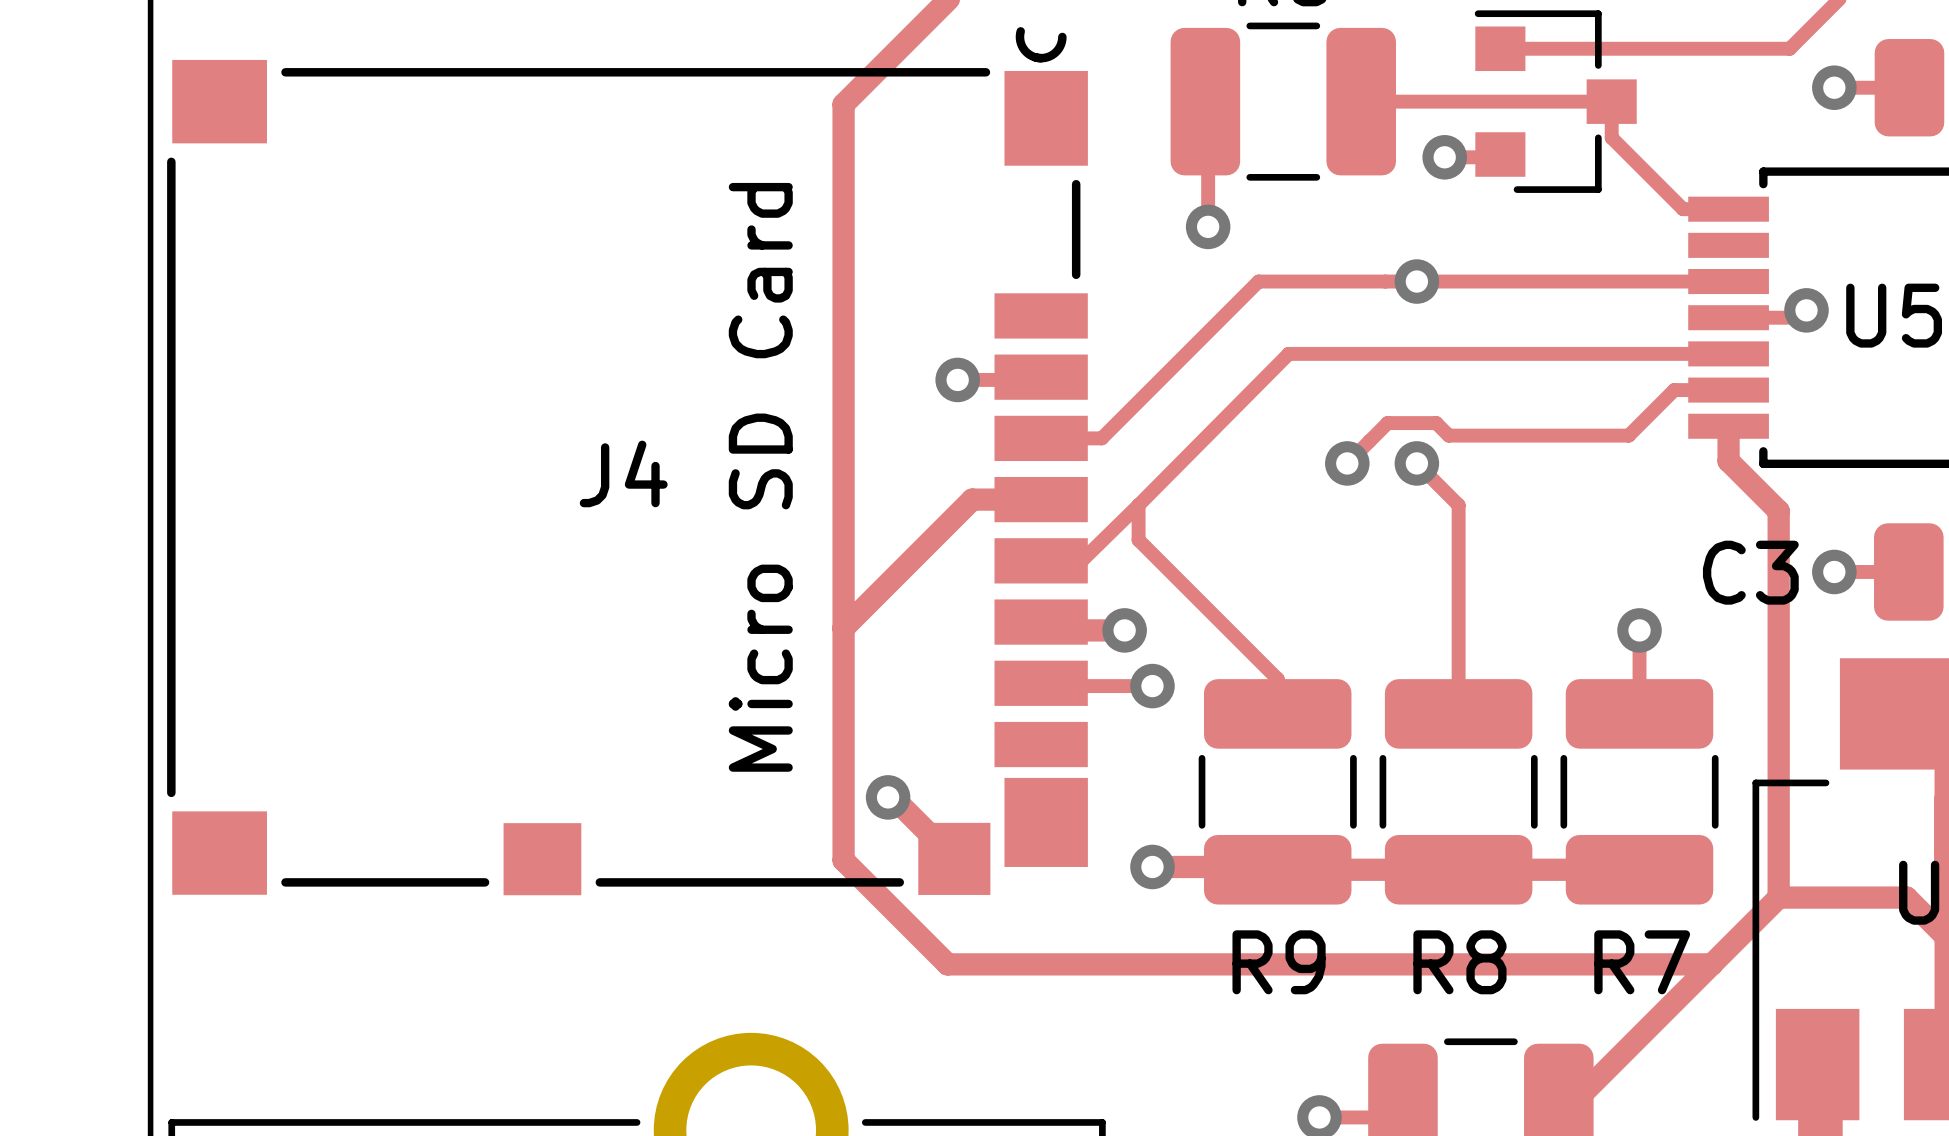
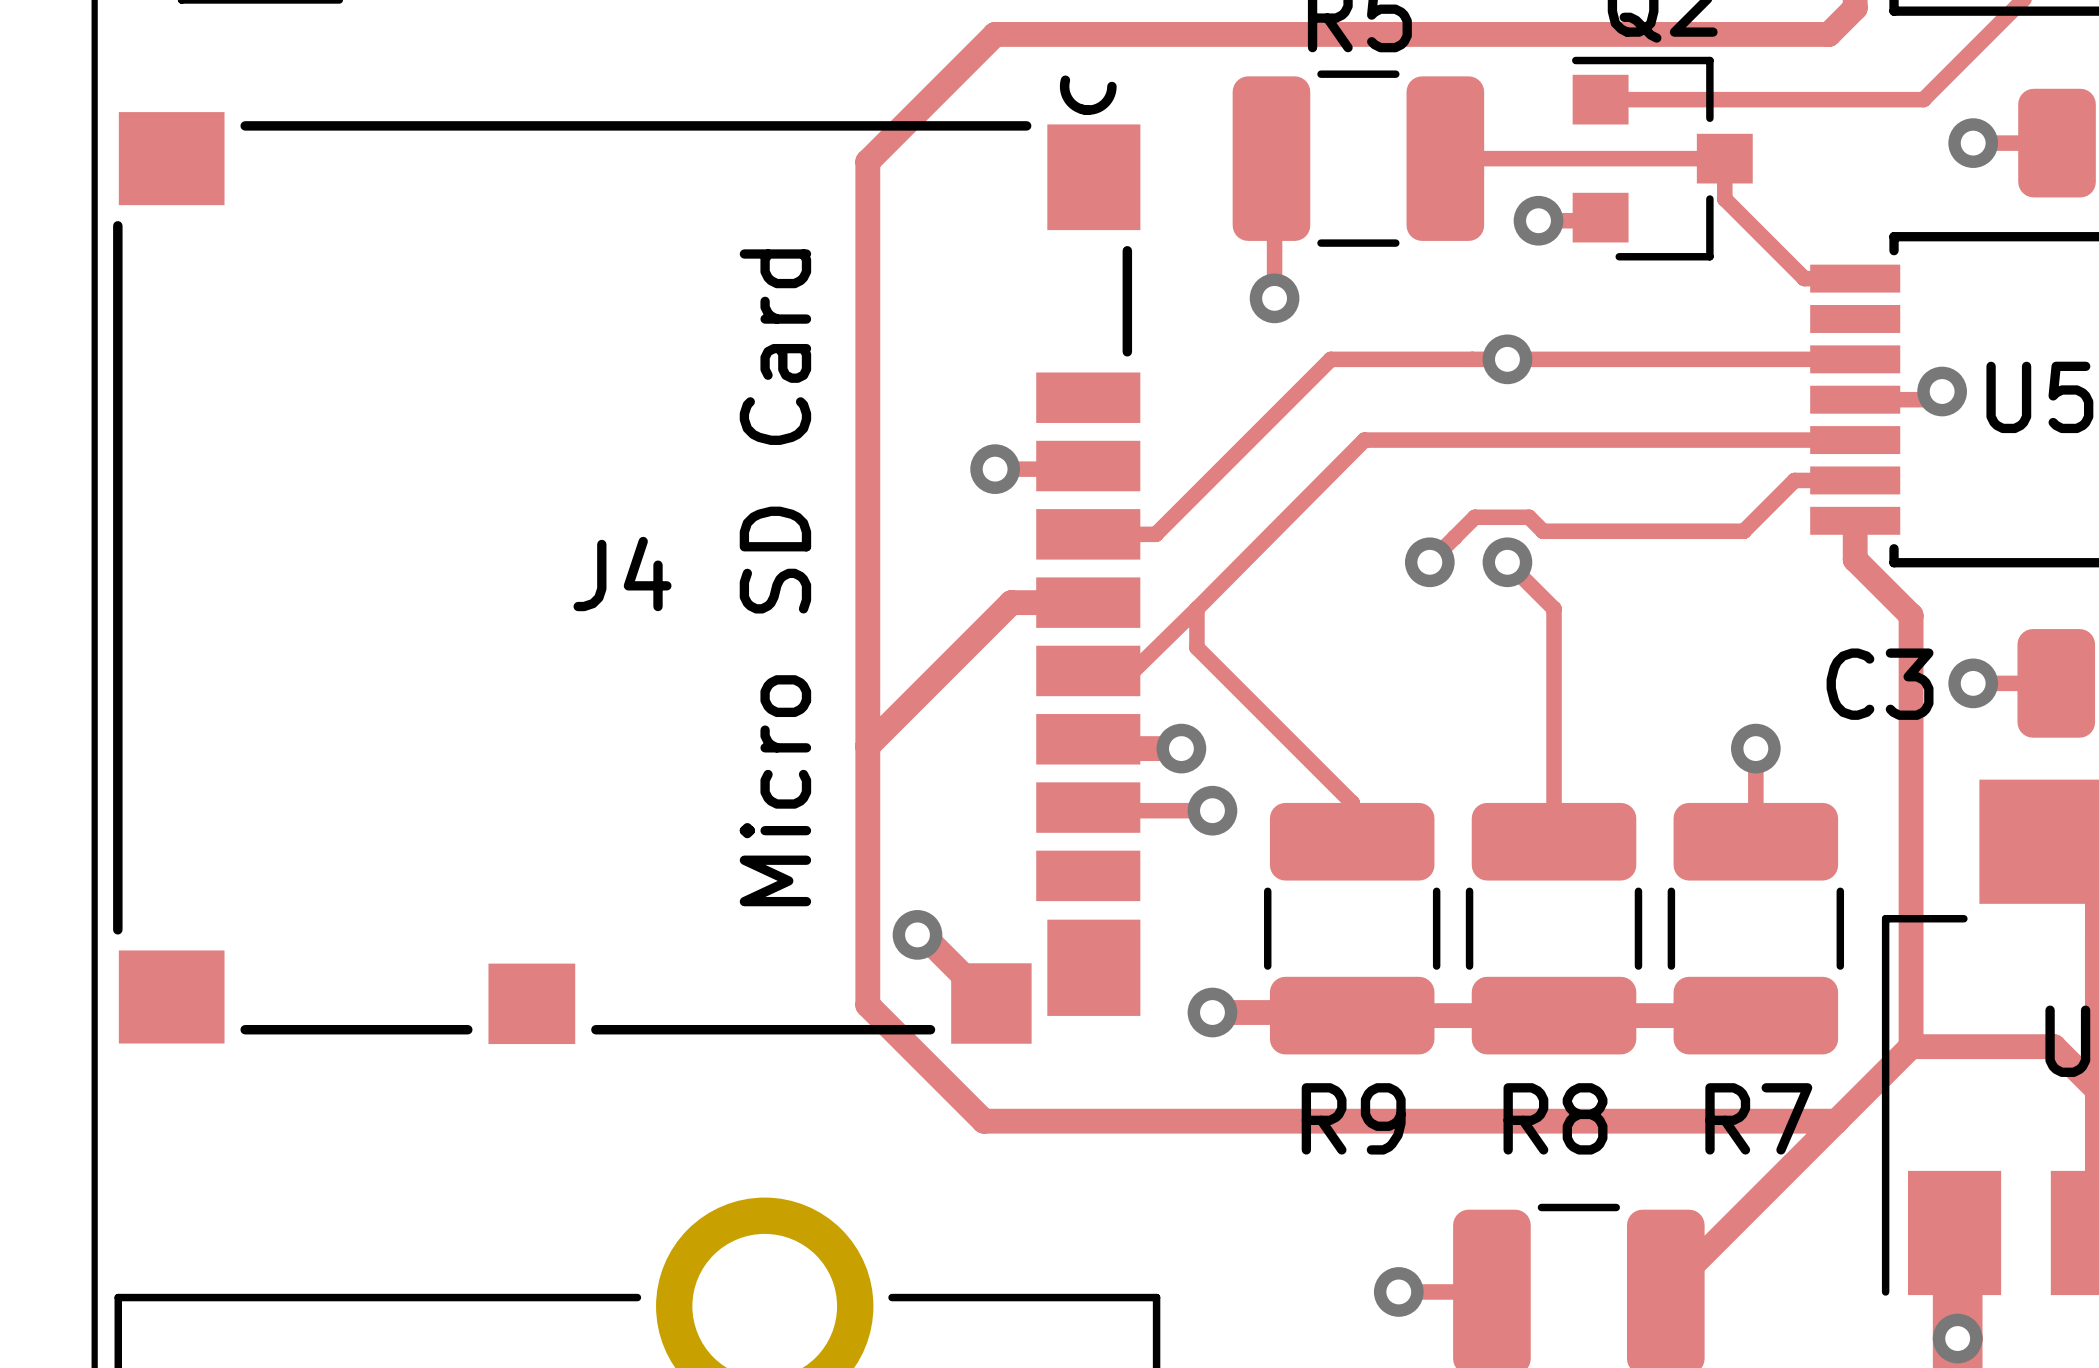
J4 footprint: [167, 27, 1088, 896] -> [113, 75, 1141, 1045]

